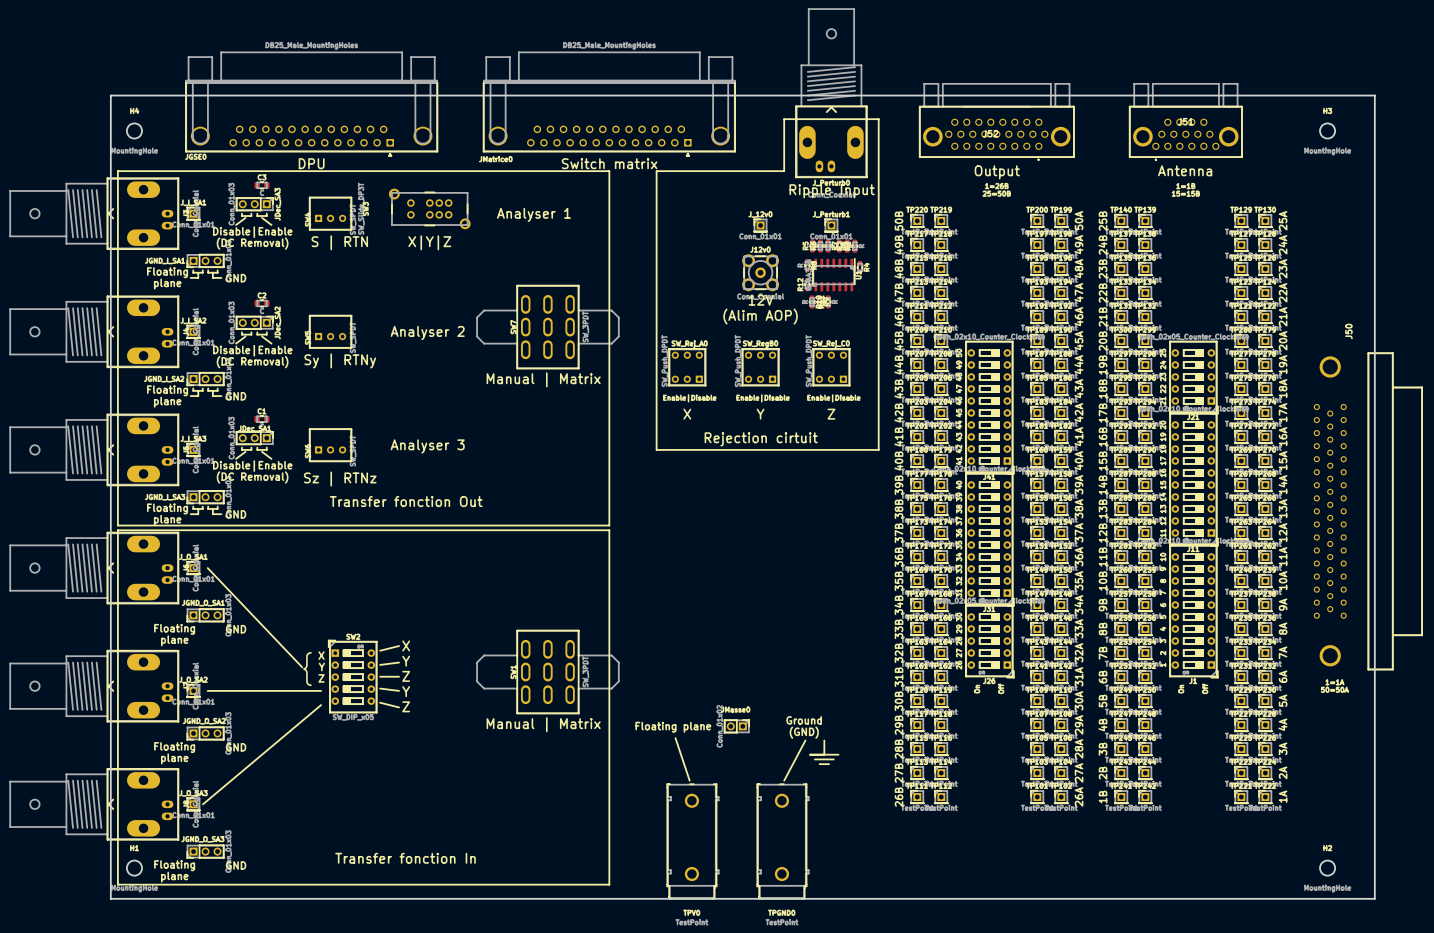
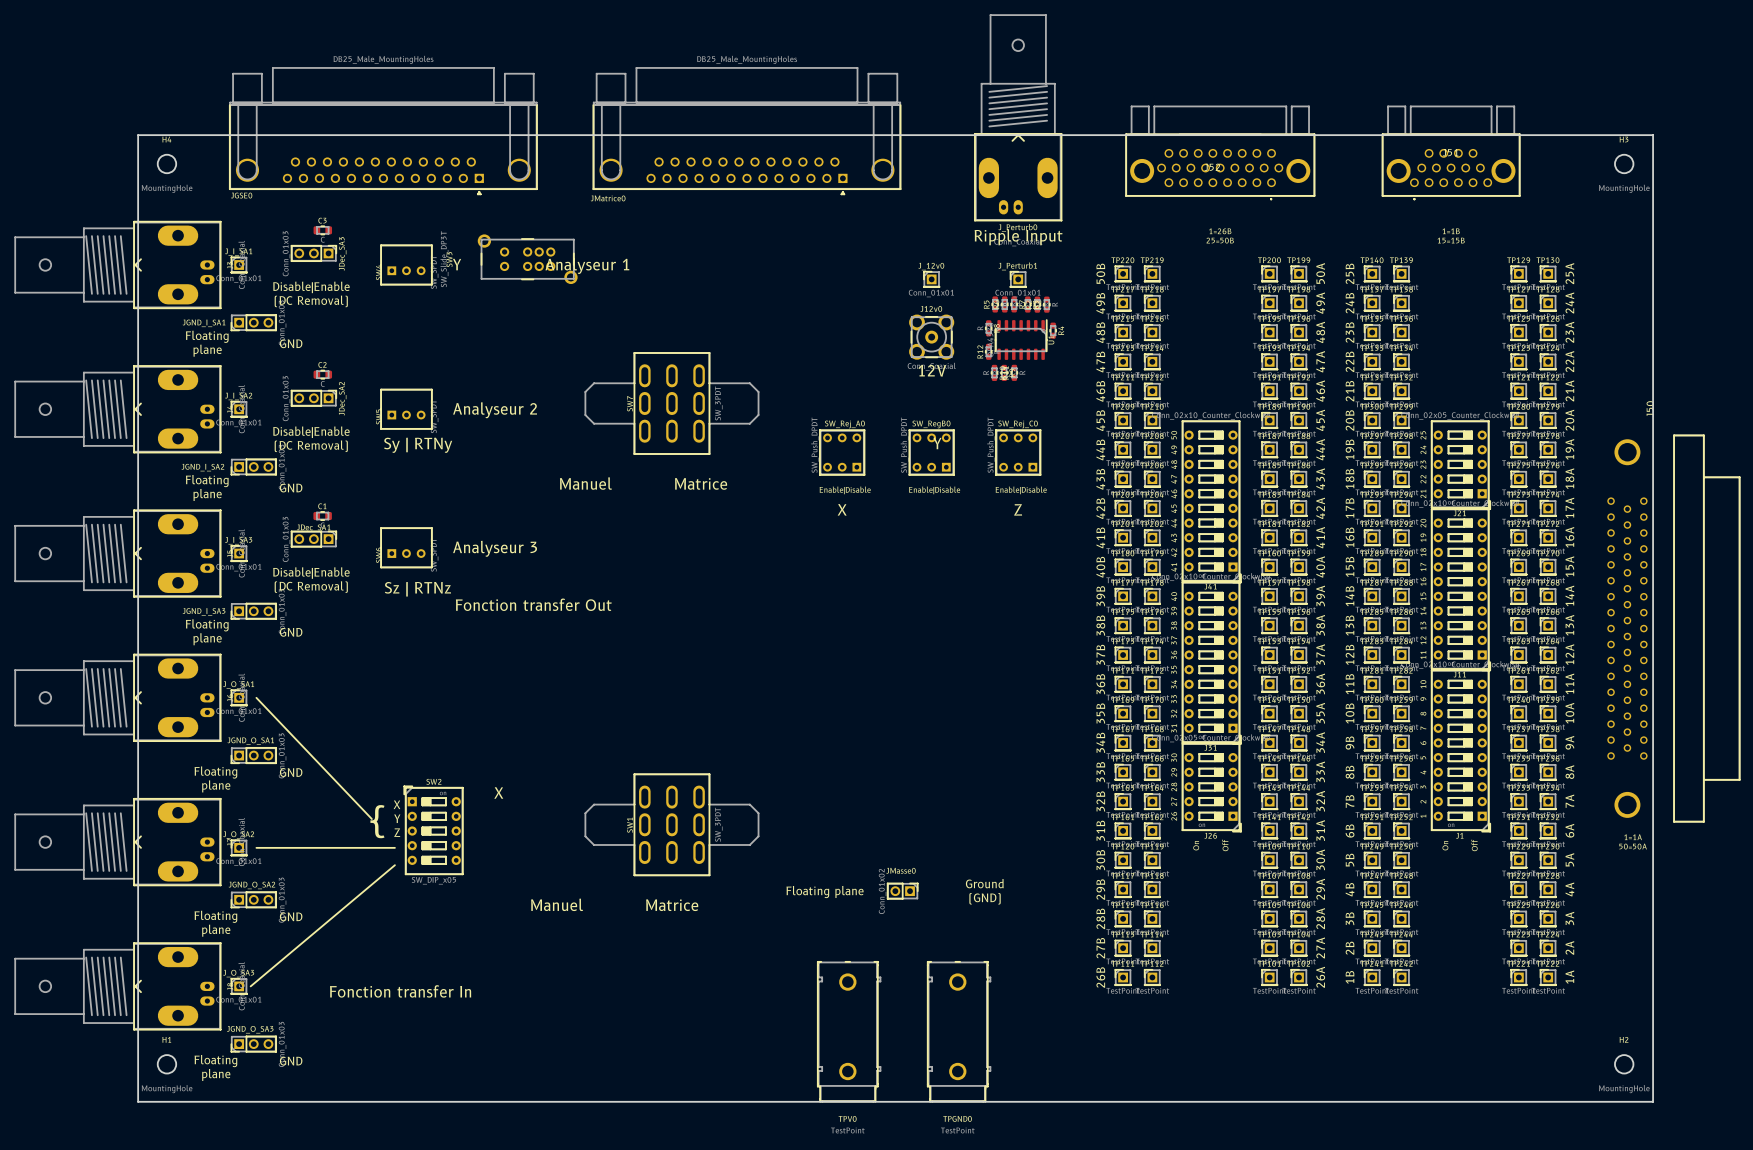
board edge: (110, 107) (110, 95) (1374, 95) (1374, 898) (1351, 898) -> (138, 135) (1653, 135) (1653, 1101)
line: (784, 119) (878, 119) (878, 449) (656, 449) (656, 171) (784, 171) (784, 119) -> none
text: DPU (311, 163) -> none
text: Switch matrix (609, 163) -> none
text: Antenna (1185, 170) -> none
line: (117, 171) (609, 171) (609, 525) (117, 525) (117, 171) -> none
text: Output (997, 172) -> none
line: (241, 213) (241, 216) (251, 216) (251, 213) -> none
line: (257, 213) (257, 216) (266, 216) (266, 213) -> none
text: none -> Y (457, 264)
text: Analyser 1 (534, 214) -> Analyseur 1 (587, 265)
line: (245, 217) (236, 225) -> none
line: (262, 217) (271, 225) -> none
text: S | RTN (339, 242) -> none
text: X|Y|Z (429, 242) -> none
line: (193, 270) (193, 272) (202, 272) (202, 270) -> none
line: (208, 270) (208, 272) (217, 272) (217, 270) -> none
line: (212, 272) (212, 277) (221, 277) -> none
line: (198, 273) (198, 277) (190, 277) -> none
text: (Alim AOP) (760, 316) -> none
line: (241, 332) (241, 334) (251, 334) (251, 332) -> none
line: (257, 332) (257, 334) (266, 334) (266, 332) -> none
text: Analyser 2 (427, 333) -> Analyseur 2 (495, 410)
line: (245, 336) (236, 343) -> none
line: (262, 336) (271, 343) -> none
text: Manual | Matrix (543, 379) -> none
line: (193, 388) (193, 390) (202, 390) (202, 388) -> none
line: (208, 388) (208, 390) (217, 390) (217, 388) -> none
line: (212, 390) (212, 396) (221, 396) -> none
line: (198, 391) (198, 396) (190, 396) -> none
text: none -> Manuel (585, 483)
text: none -> Matrice (701, 483)
text position: Y (760, 414) -> Y (937, 443)
text: Rejection cirtuit (761, 439) -> none
text: Analyser 3 (427, 446) -> Analyseur 3 (495, 548)
line: (241, 447) (241, 449) (251, 449) (251, 447) -> none
line: (257, 447) (257, 449) (266, 449) (266, 447) -> none
line: (245, 451) (236, 458) -> none
line: (262, 451) (271, 458) -> none
text: none -> Fonction transfer Out (533, 604)
text: Transfer fonction Out (406, 501) -> none
line: (193, 506) (193, 508) (202, 508) (202, 506) -> none
line: (208, 506) (208, 508) (217, 508) (217, 506) -> none
line: (212, 508) (212, 514) (221, 514) -> none
line: (198, 509) (198, 514) (190, 514) -> none
line: (117, 530) (117, 884) (609, 884) (609, 530) (117, 530) -> none
line: (399, 646) (380, 650) -> none
text: Y (406, 661) -> none
line: (399, 662) (380, 664) -> none
line: (380, 676) (399, 676) -> none
text: Z (406, 676) -> none
line: (380, 688) (399, 690) -> none
text: Y (406, 691) -> none
line: (380, 702) (399, 707) -> none
text: Z (406, 706) -> none
text: Manual | Matrix (543, 724) -> none
text: none -> Manuel (557, 904)
text: none -> Matrice (672, 905)
line: (675, 738) (689, 780) -> none
line: (805, 740) (784, 780) -> none
line: (824, 740) (824, 754) -> none
line: (810, 754) (838, 754) -> none
line: (814, 759) (833, 759) -> none
line: (819, 764) (829, 764) -> none
text: none -> Fonction transfer In (400, 991)
text: Transfer fonction In (405, 858) -> none

